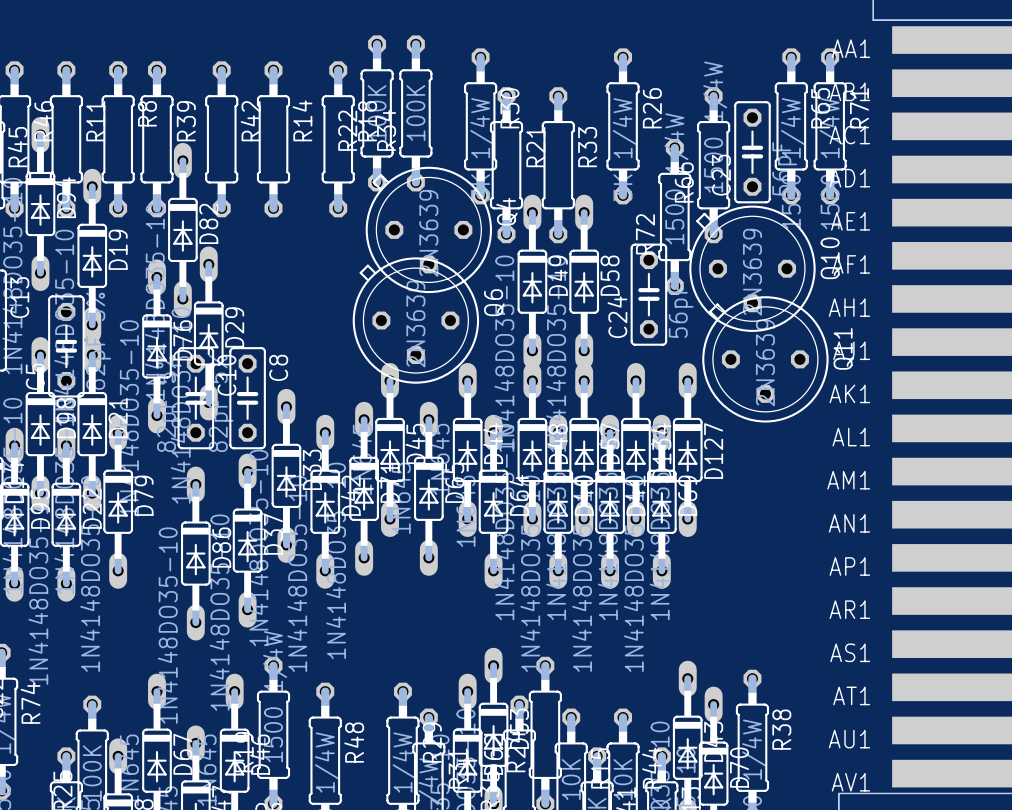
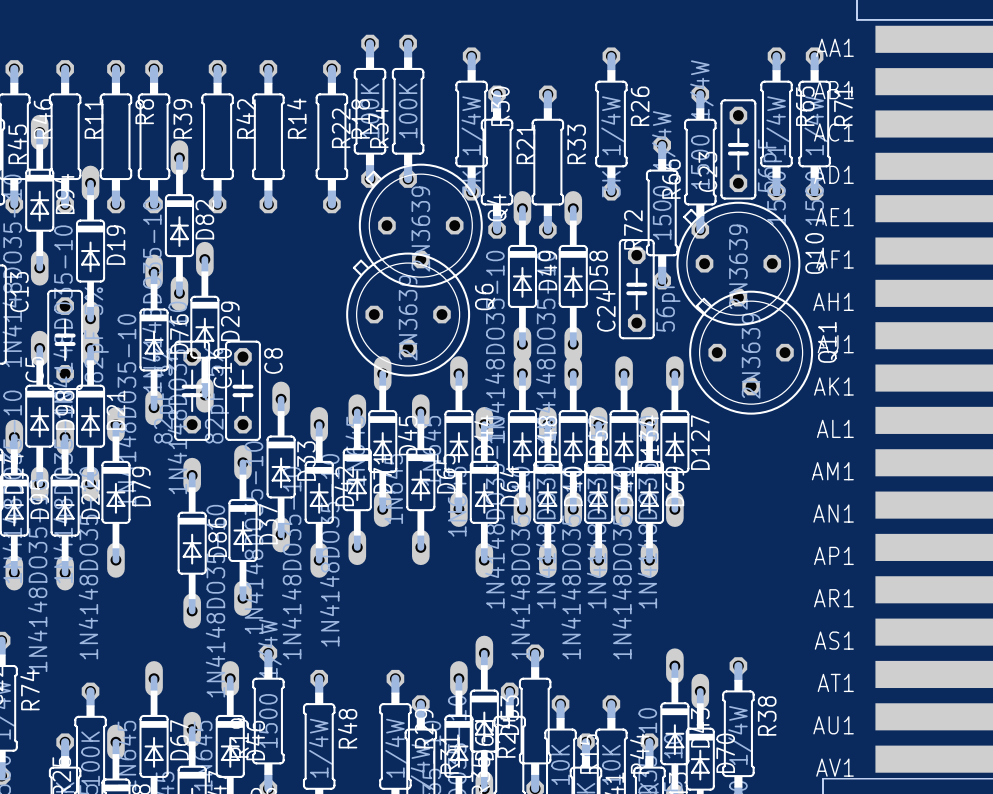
D86 value: 1N4148DO35-10 (167, 625) -> none

